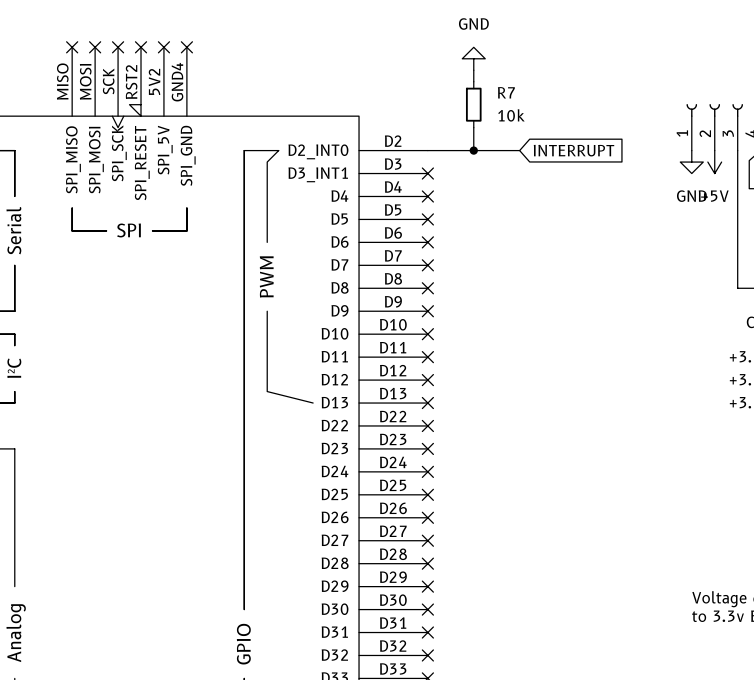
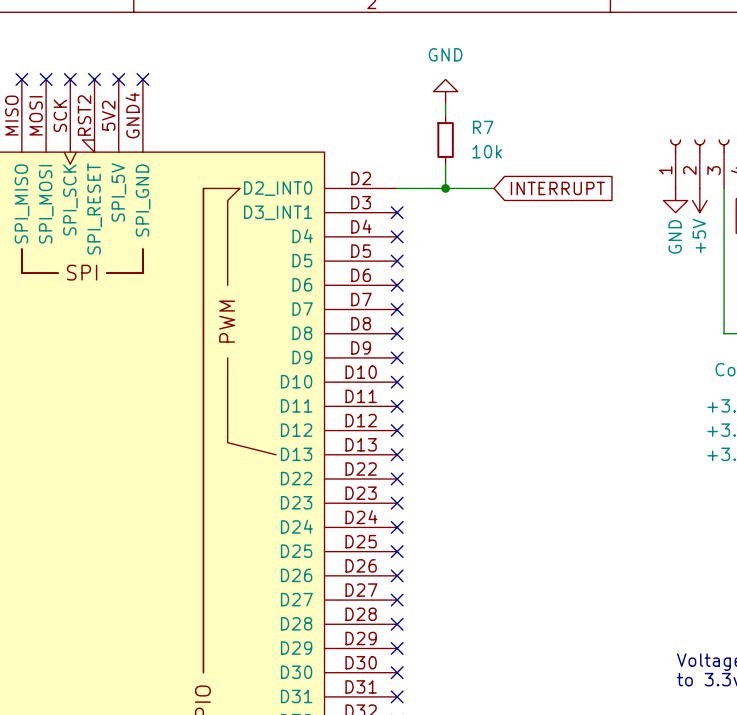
power symbol text rotation: 0° (691, 196) -> 90° counterclockwise (675, 236)
power symbol text rotation: 0° (714, 196) -> 90° counterclockwise (699, 236)

